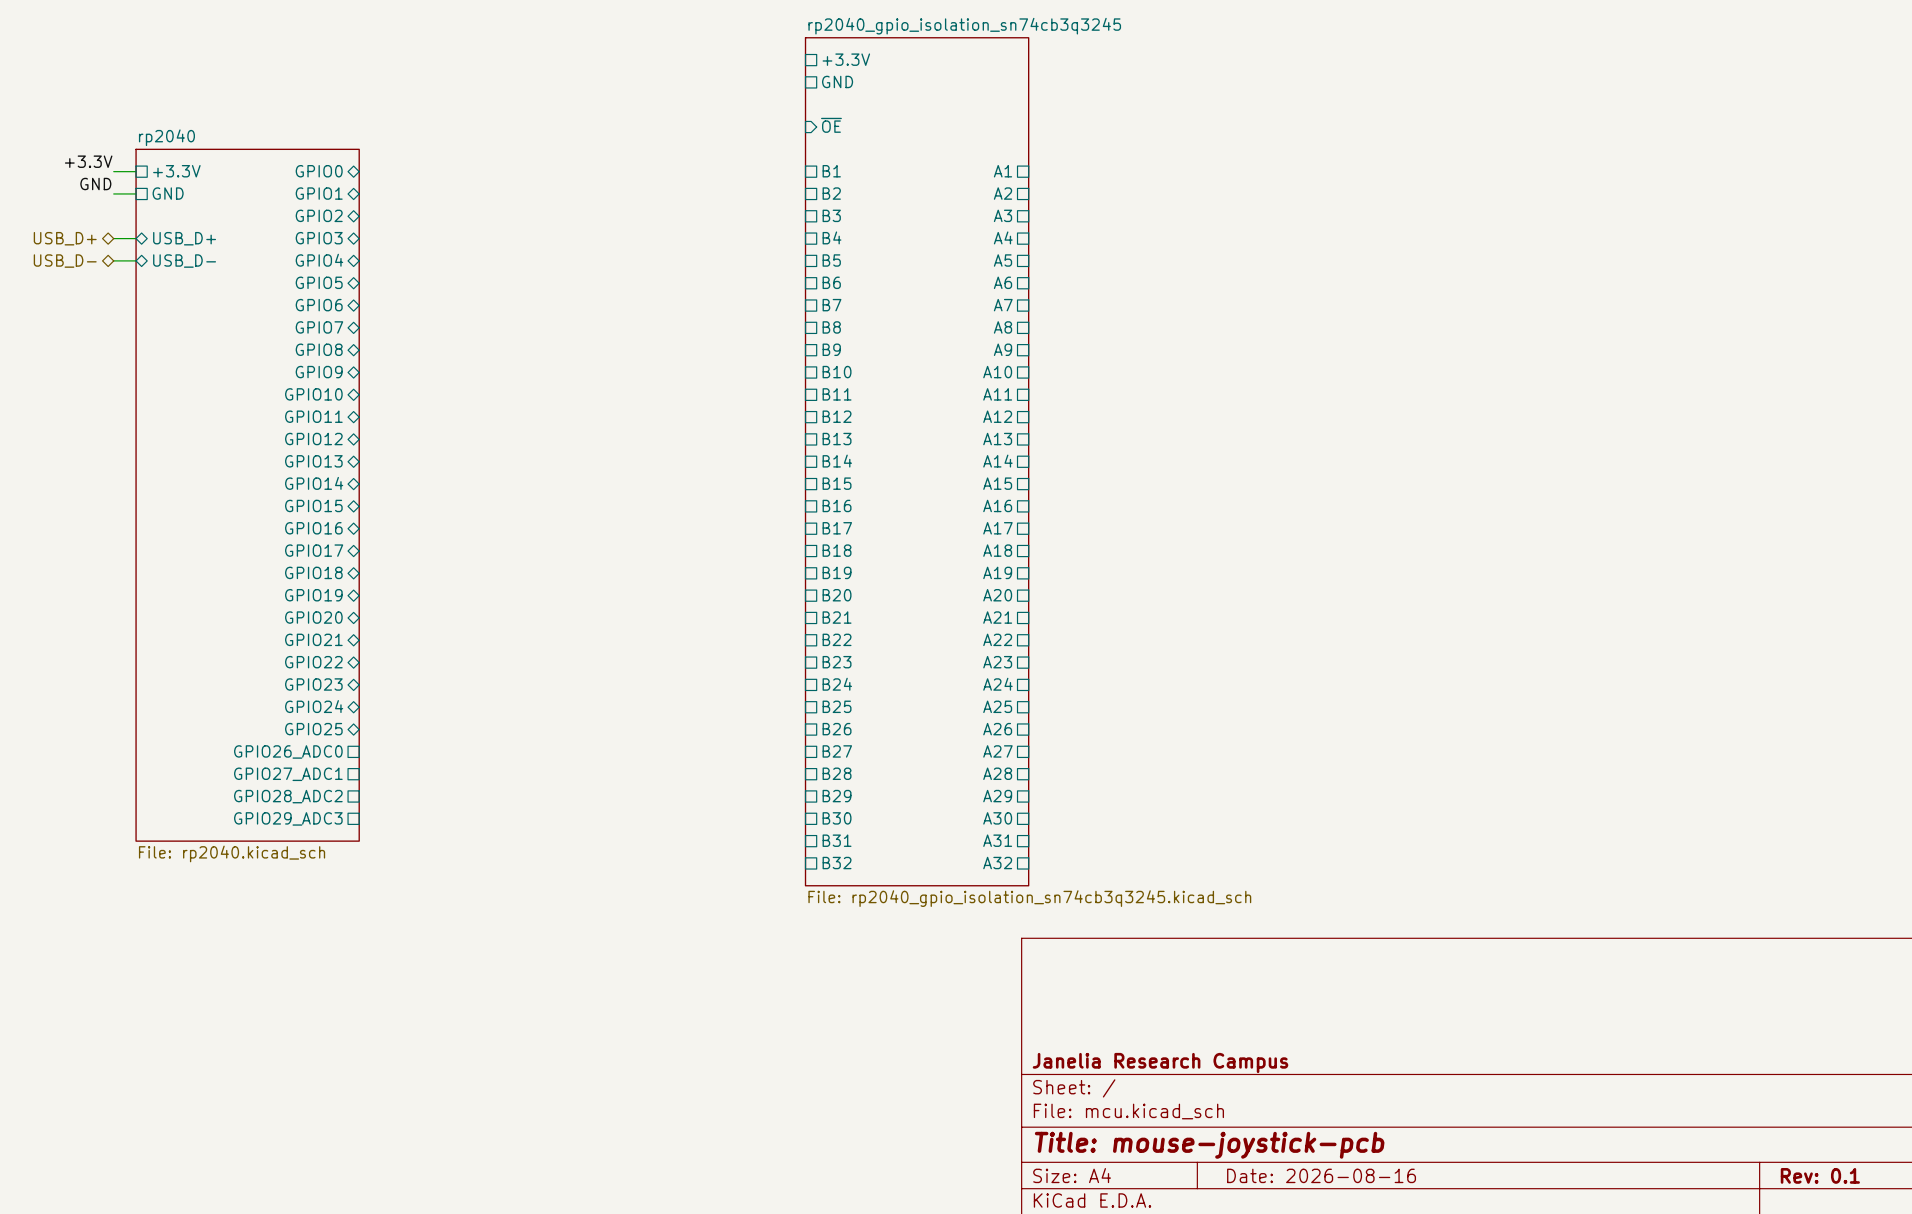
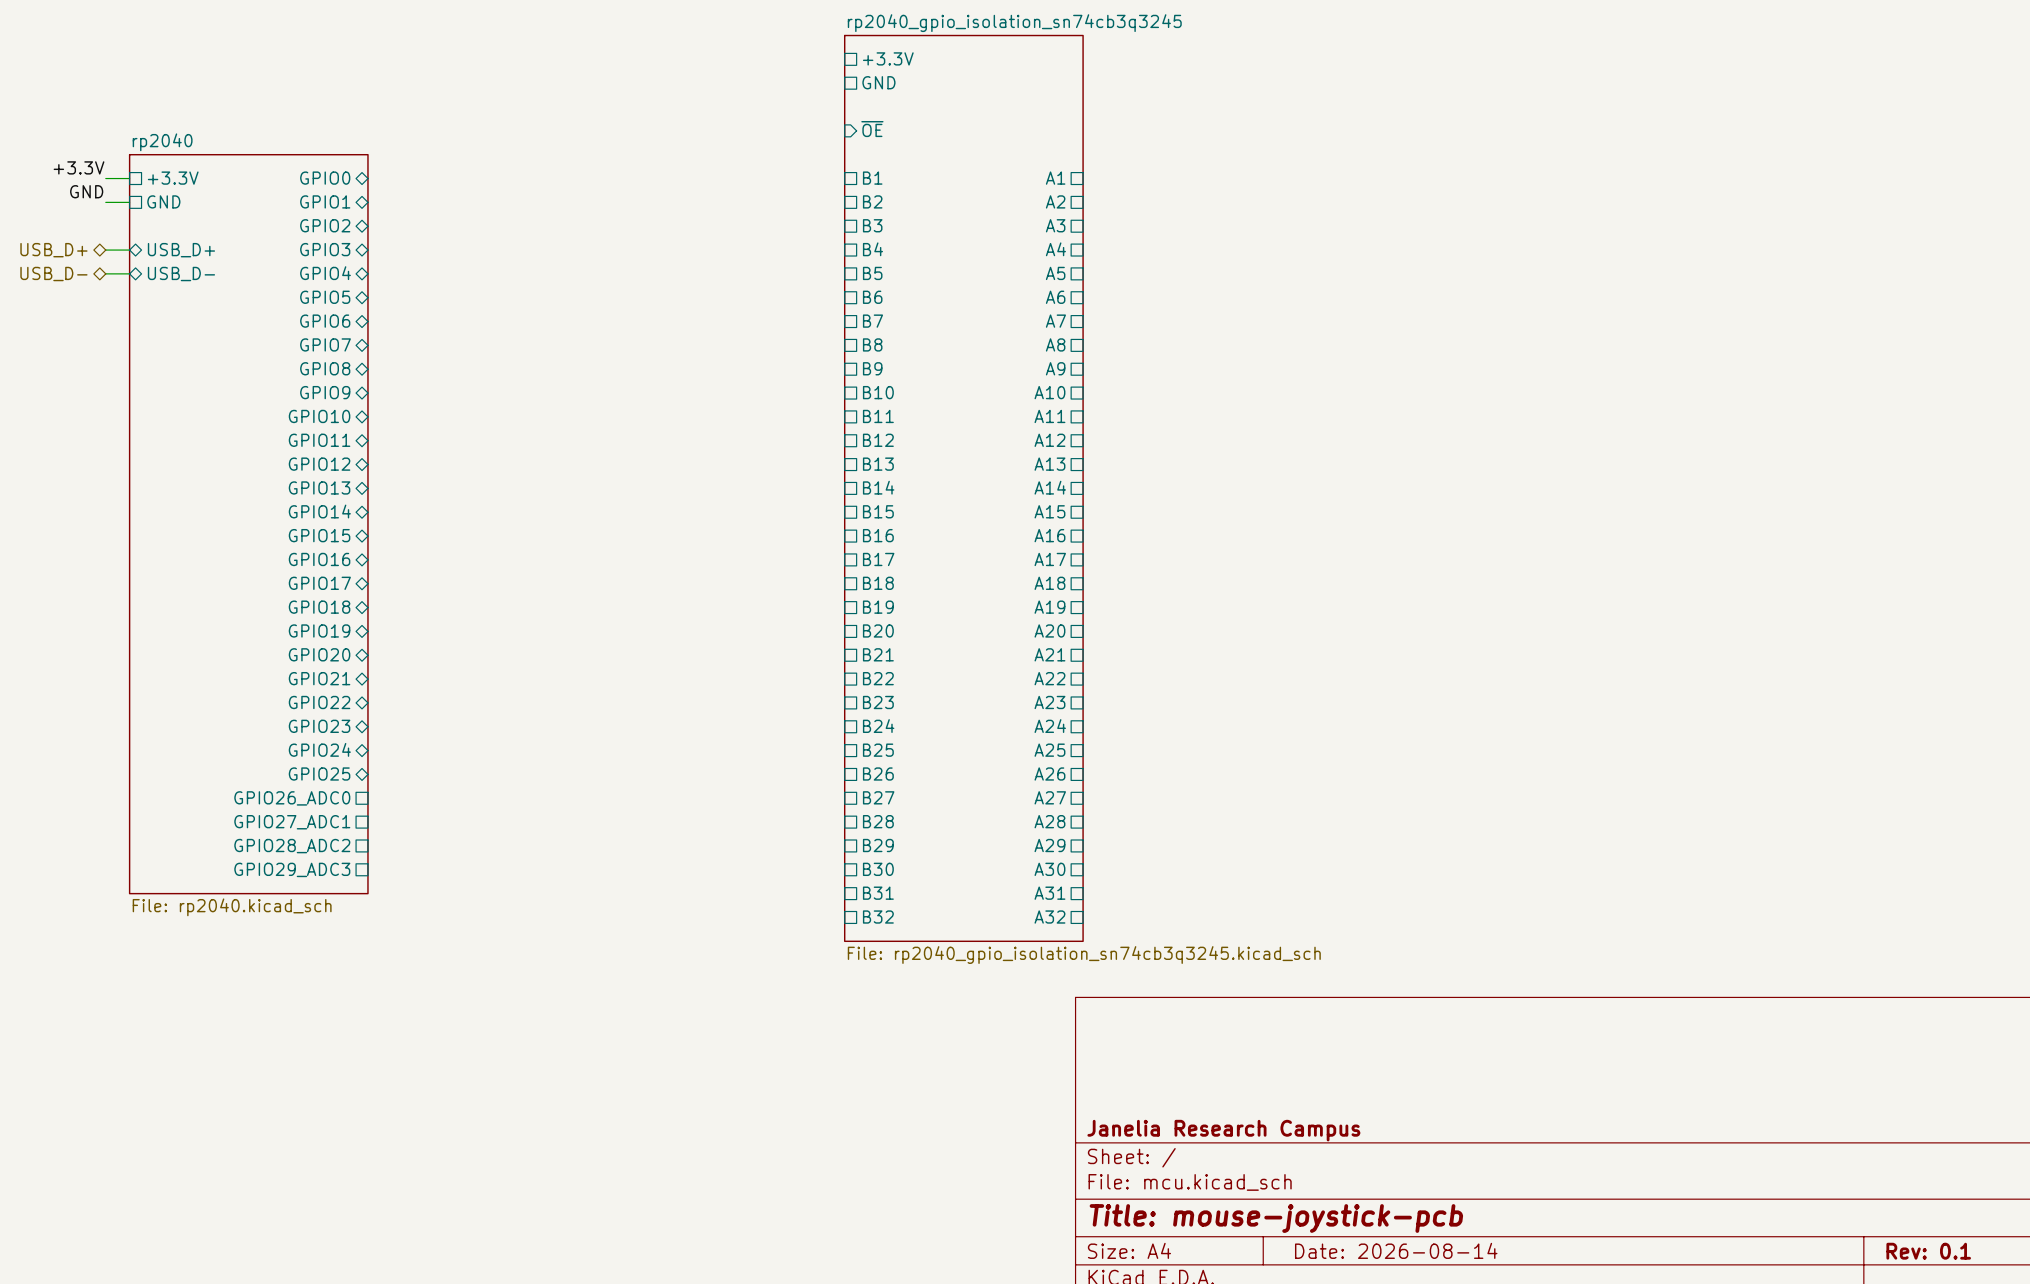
title block: Date: 2026-08-16 (1321, 1175) -> Date: 2026-08-14 (1396, 1250)

